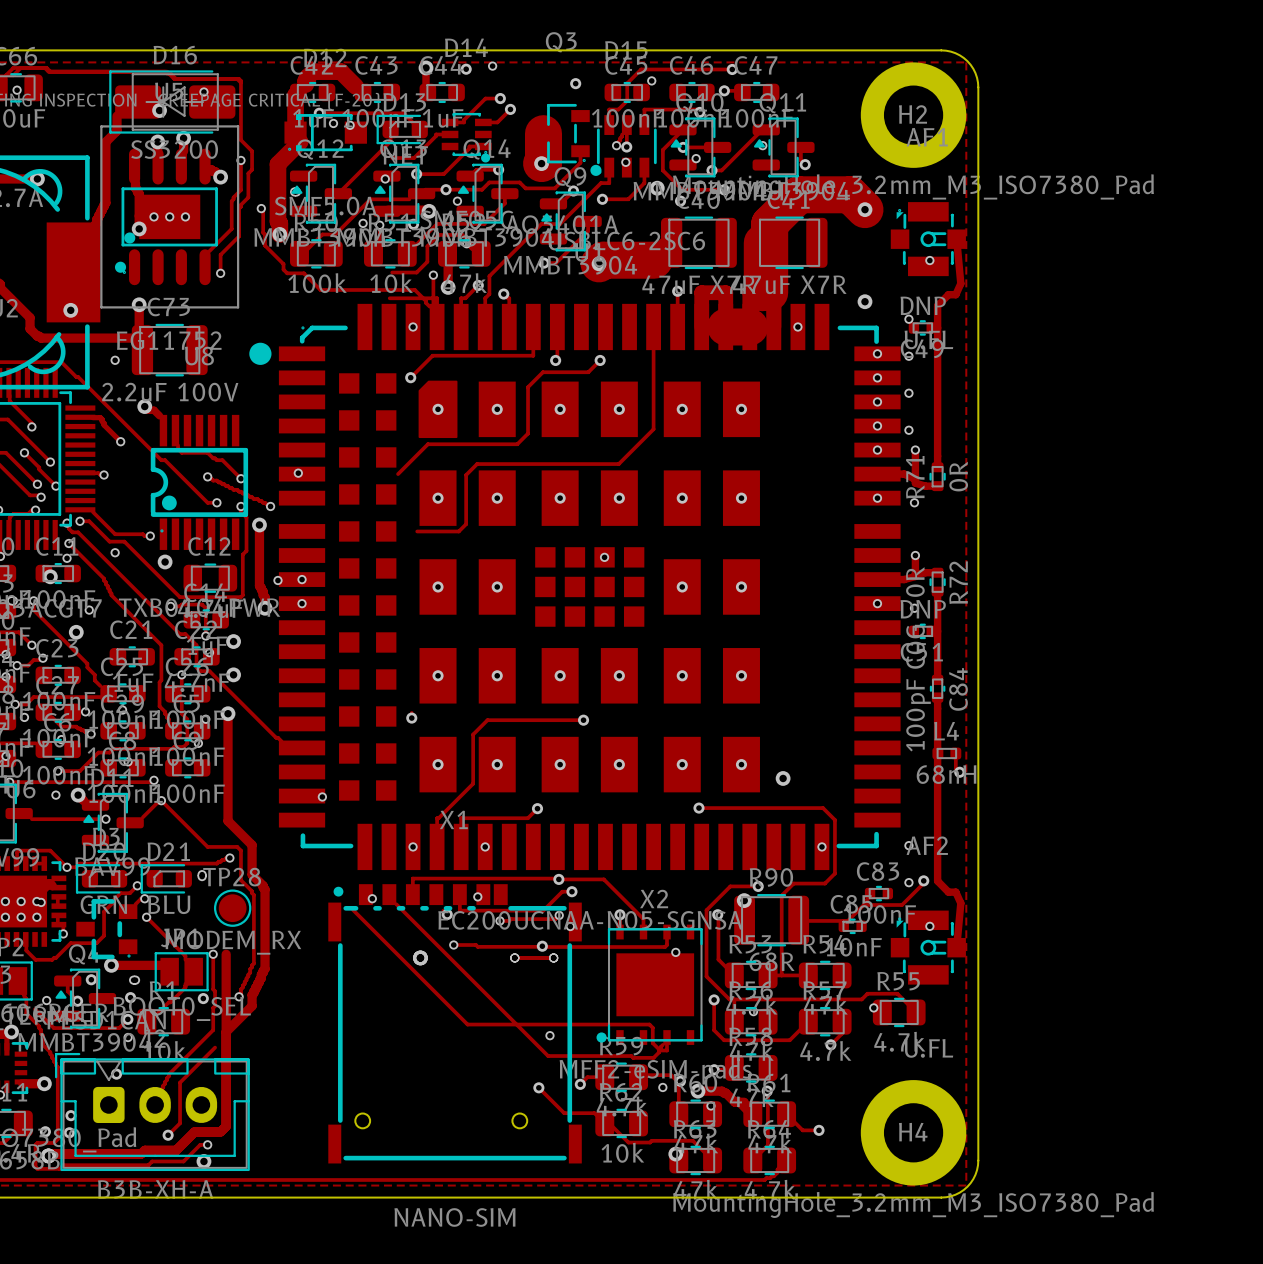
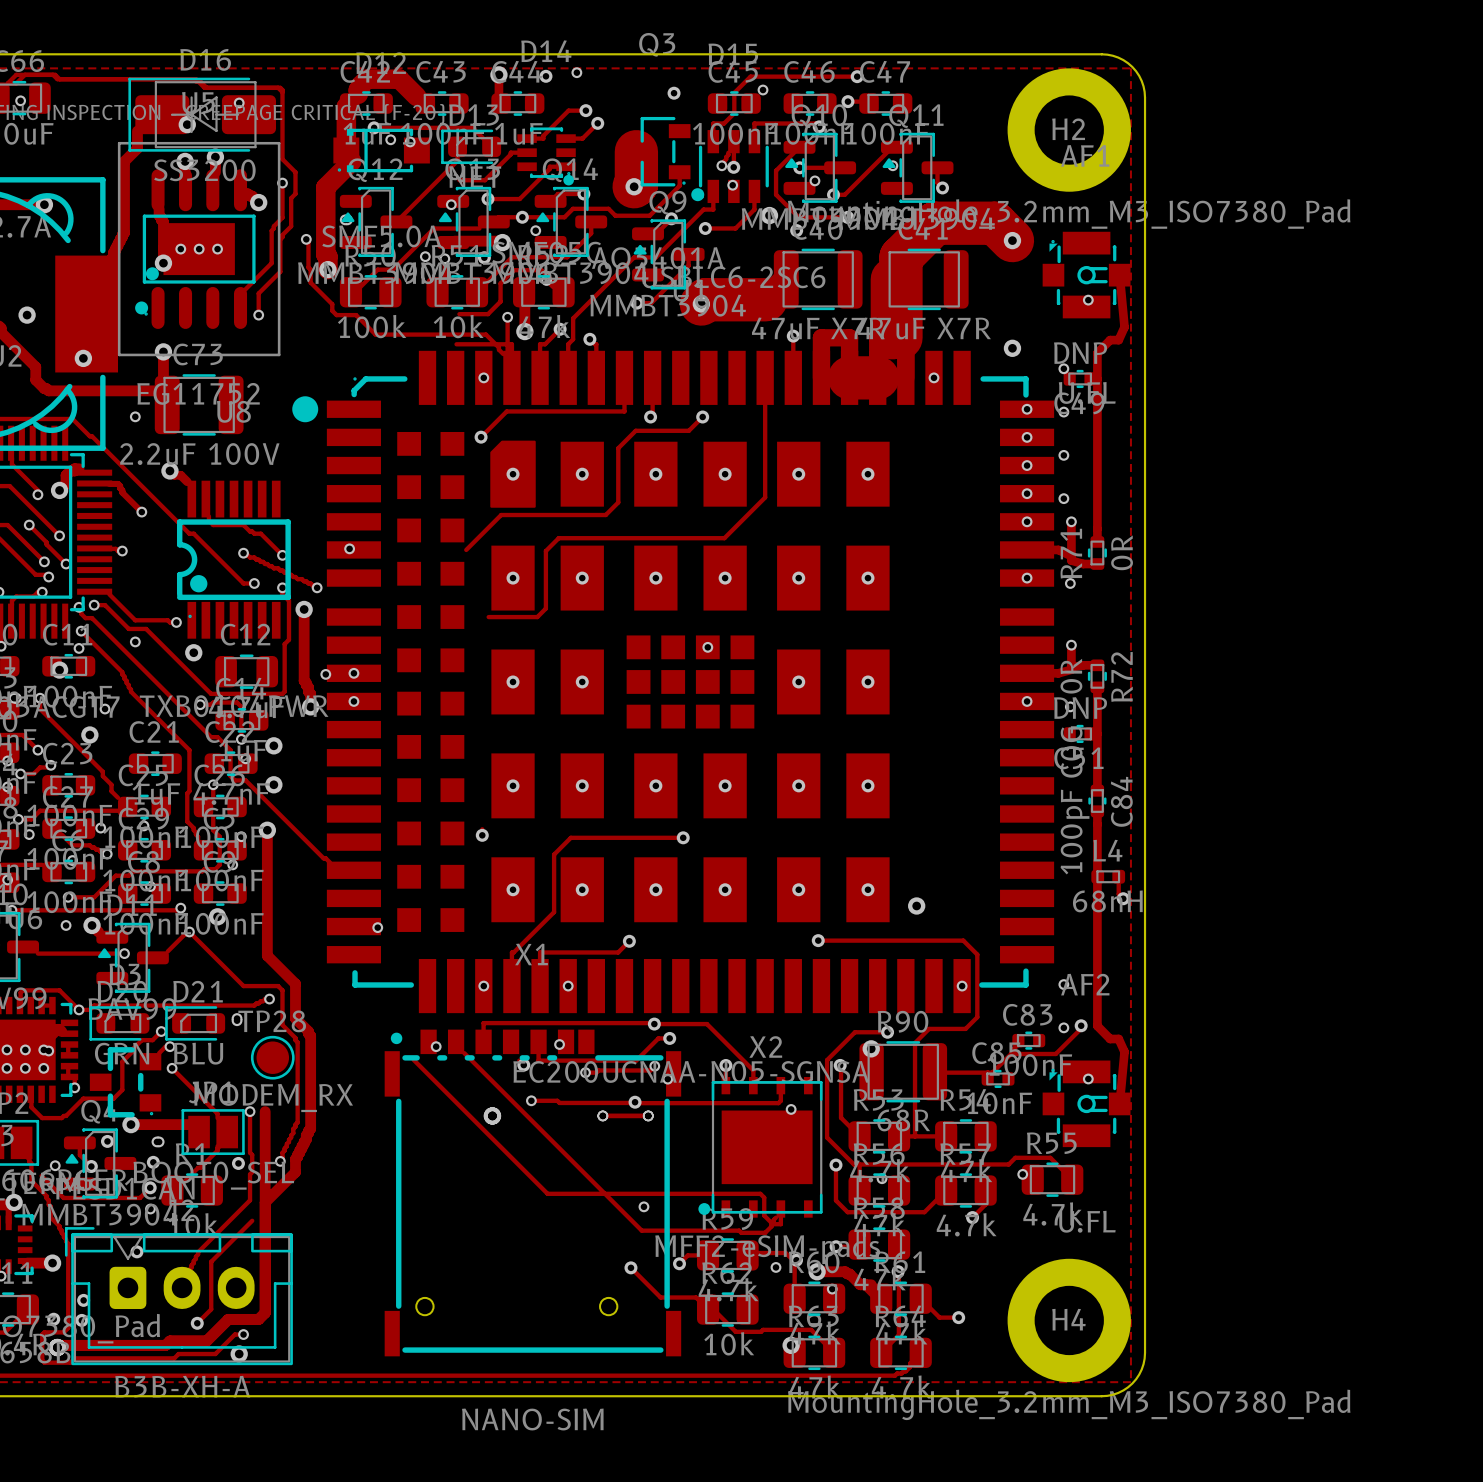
via: none -> (27, 315)
track: none -> (79, 468) (74, 468) (74, 470) (70, 470) (66, 475) (66, 483) (59, 490)
via: none -> (59, 490)
via: none -> (217, 916)

